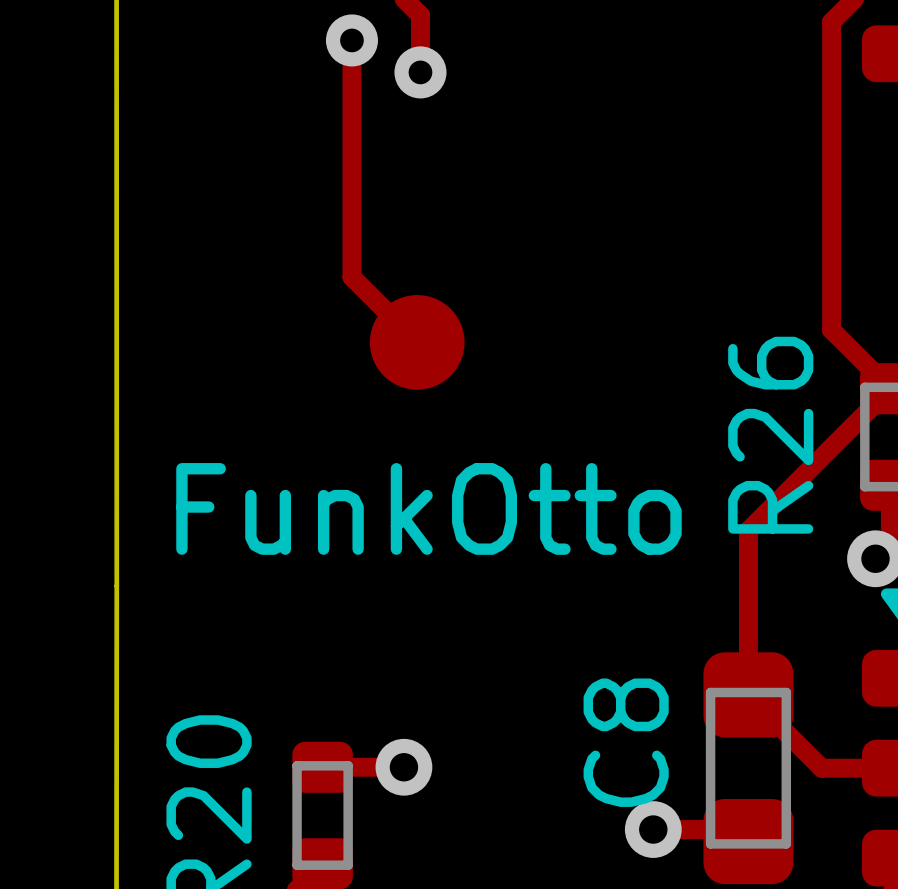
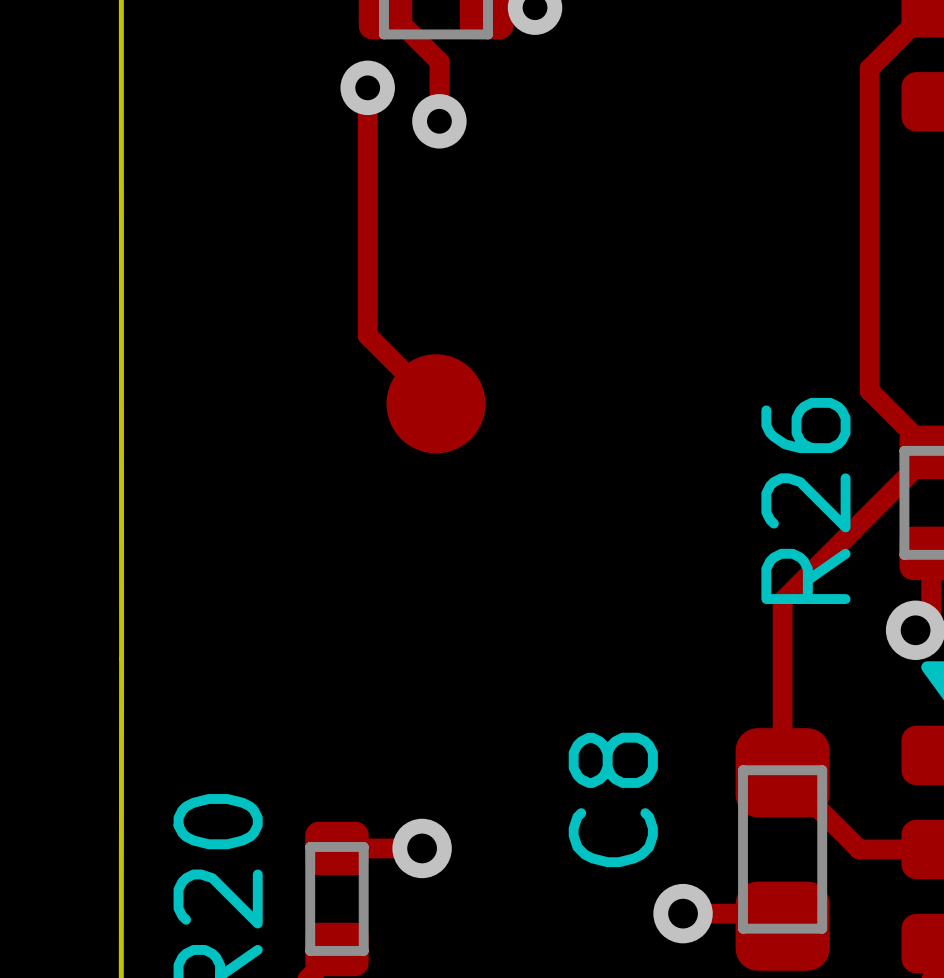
text: FunkOtto (428, 508) -> none
C8 name position: C8 (626, 742) -> C8 (613, 799)

